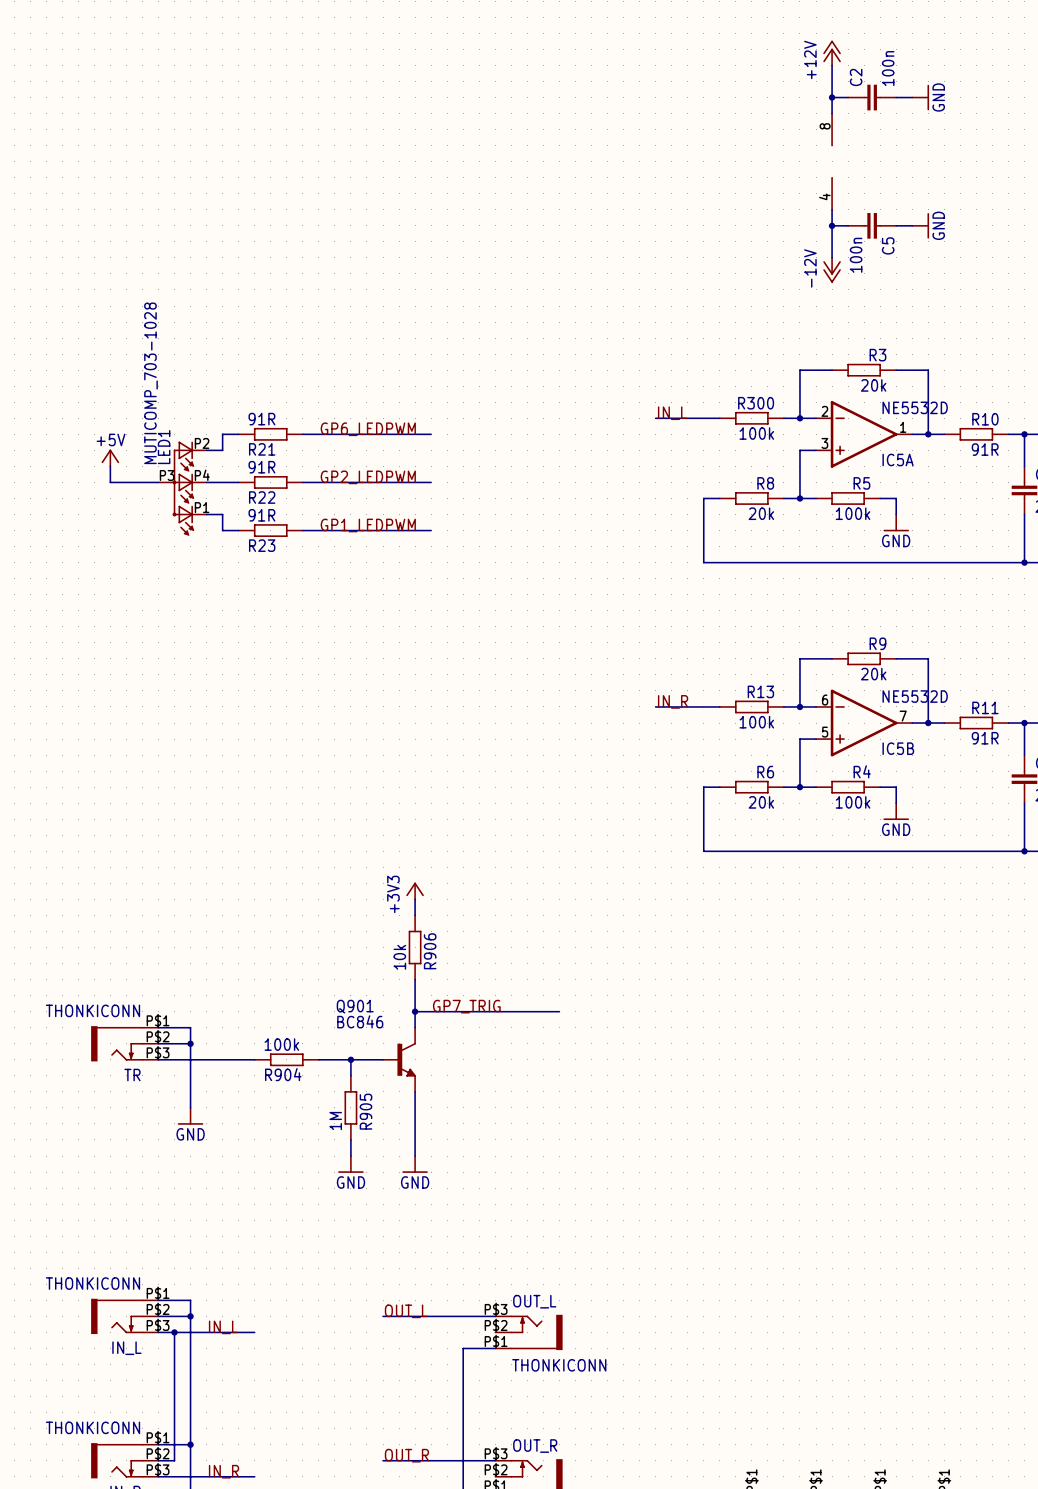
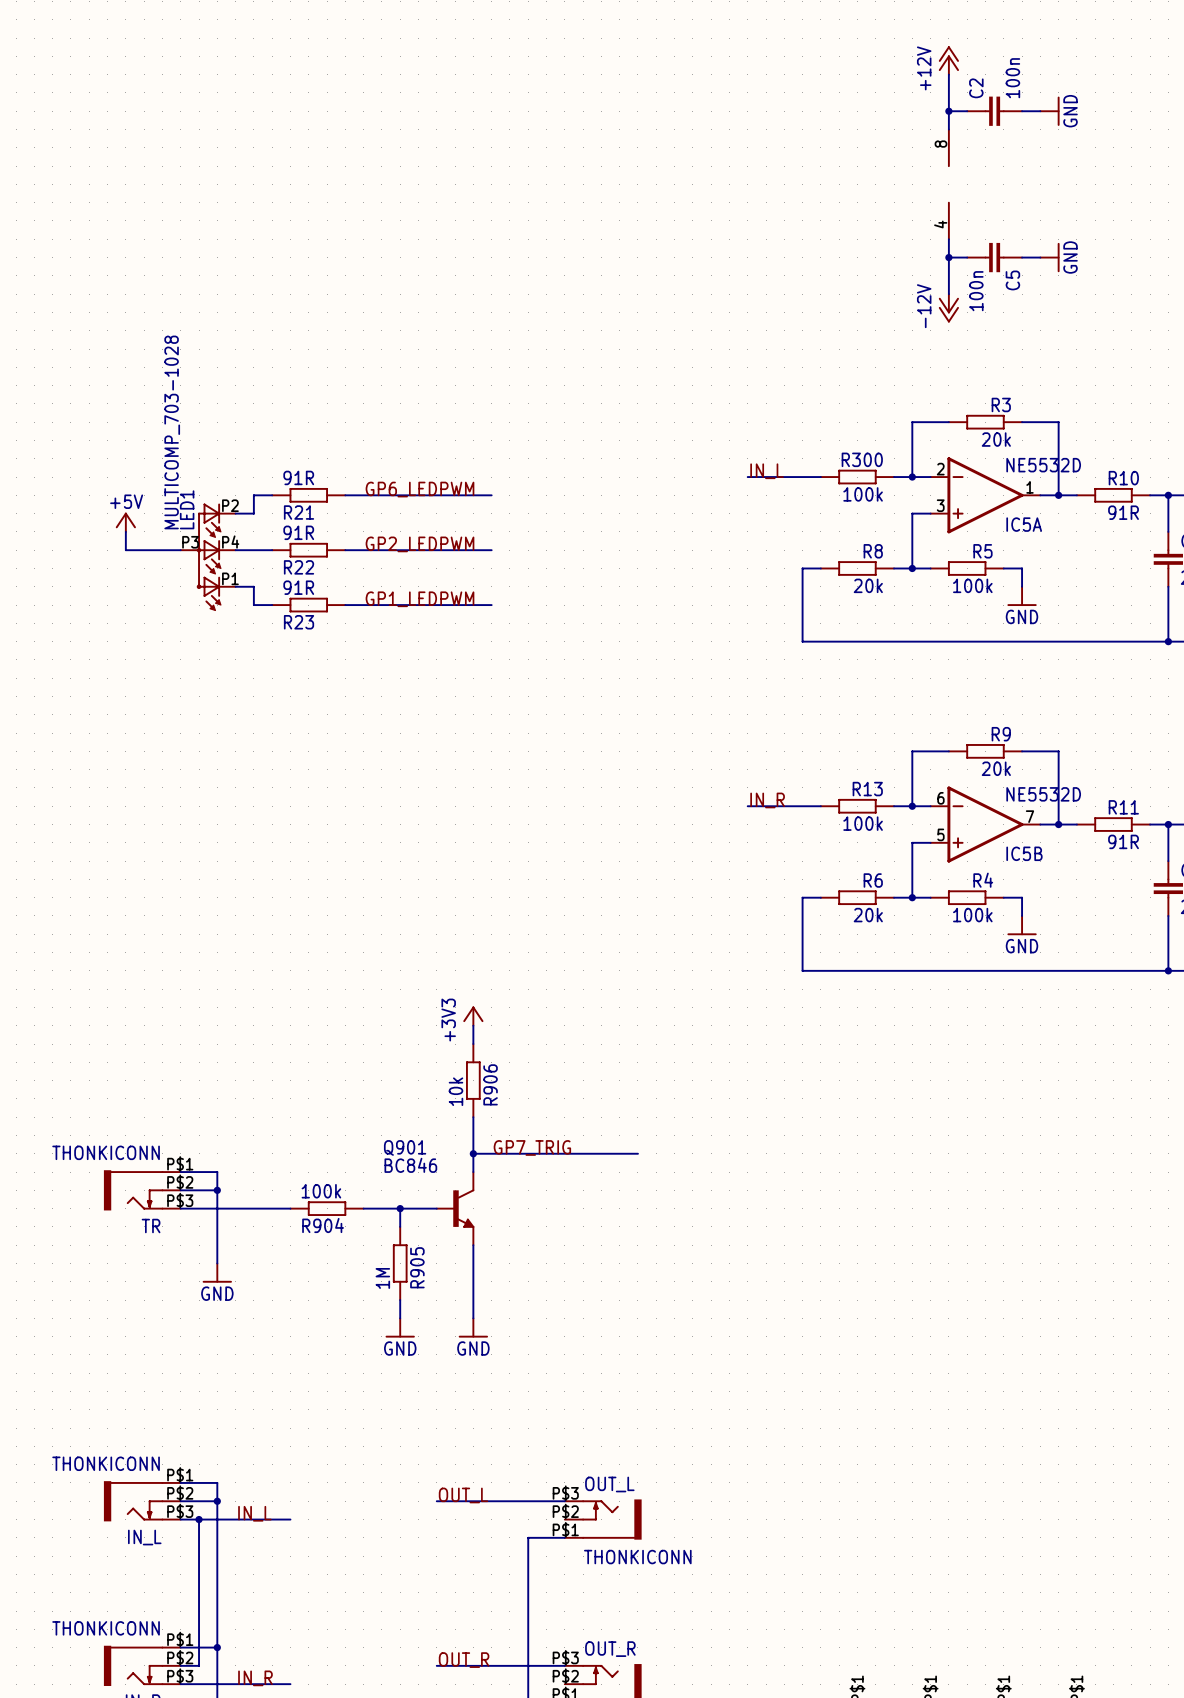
LED1 value: MUTICOMP_703-1028 (150, 383) -> MULTICOMP_703-1028 (172, 432)

